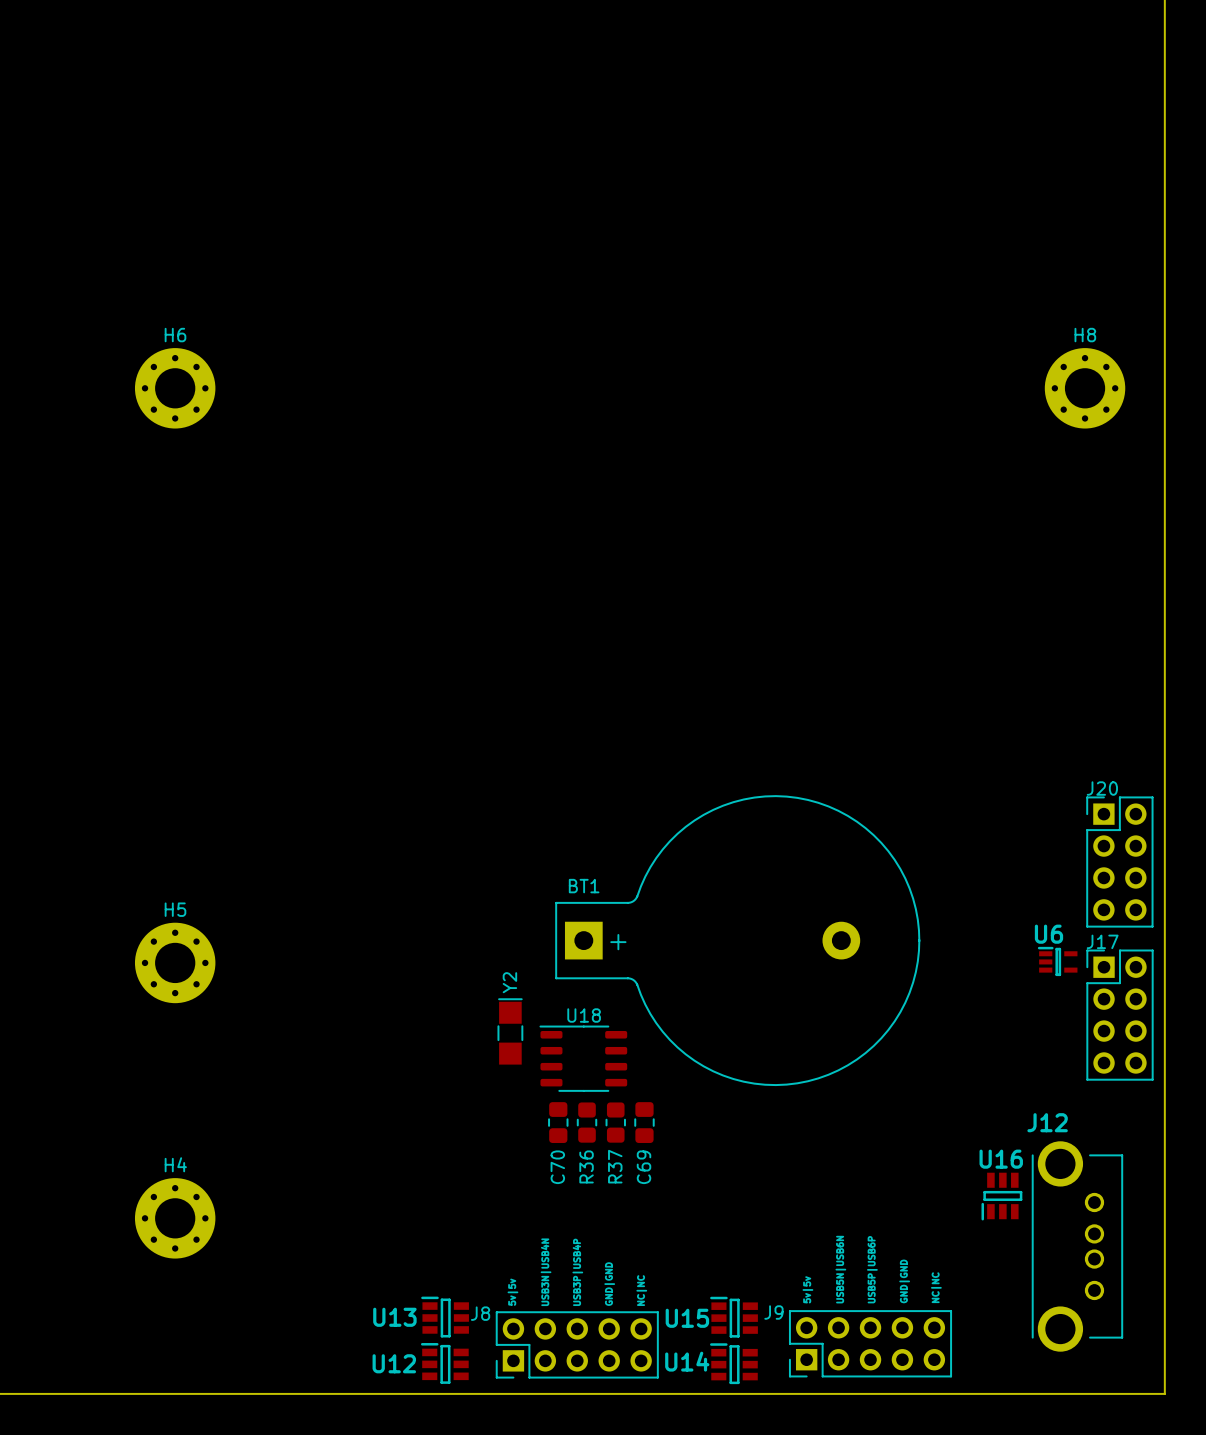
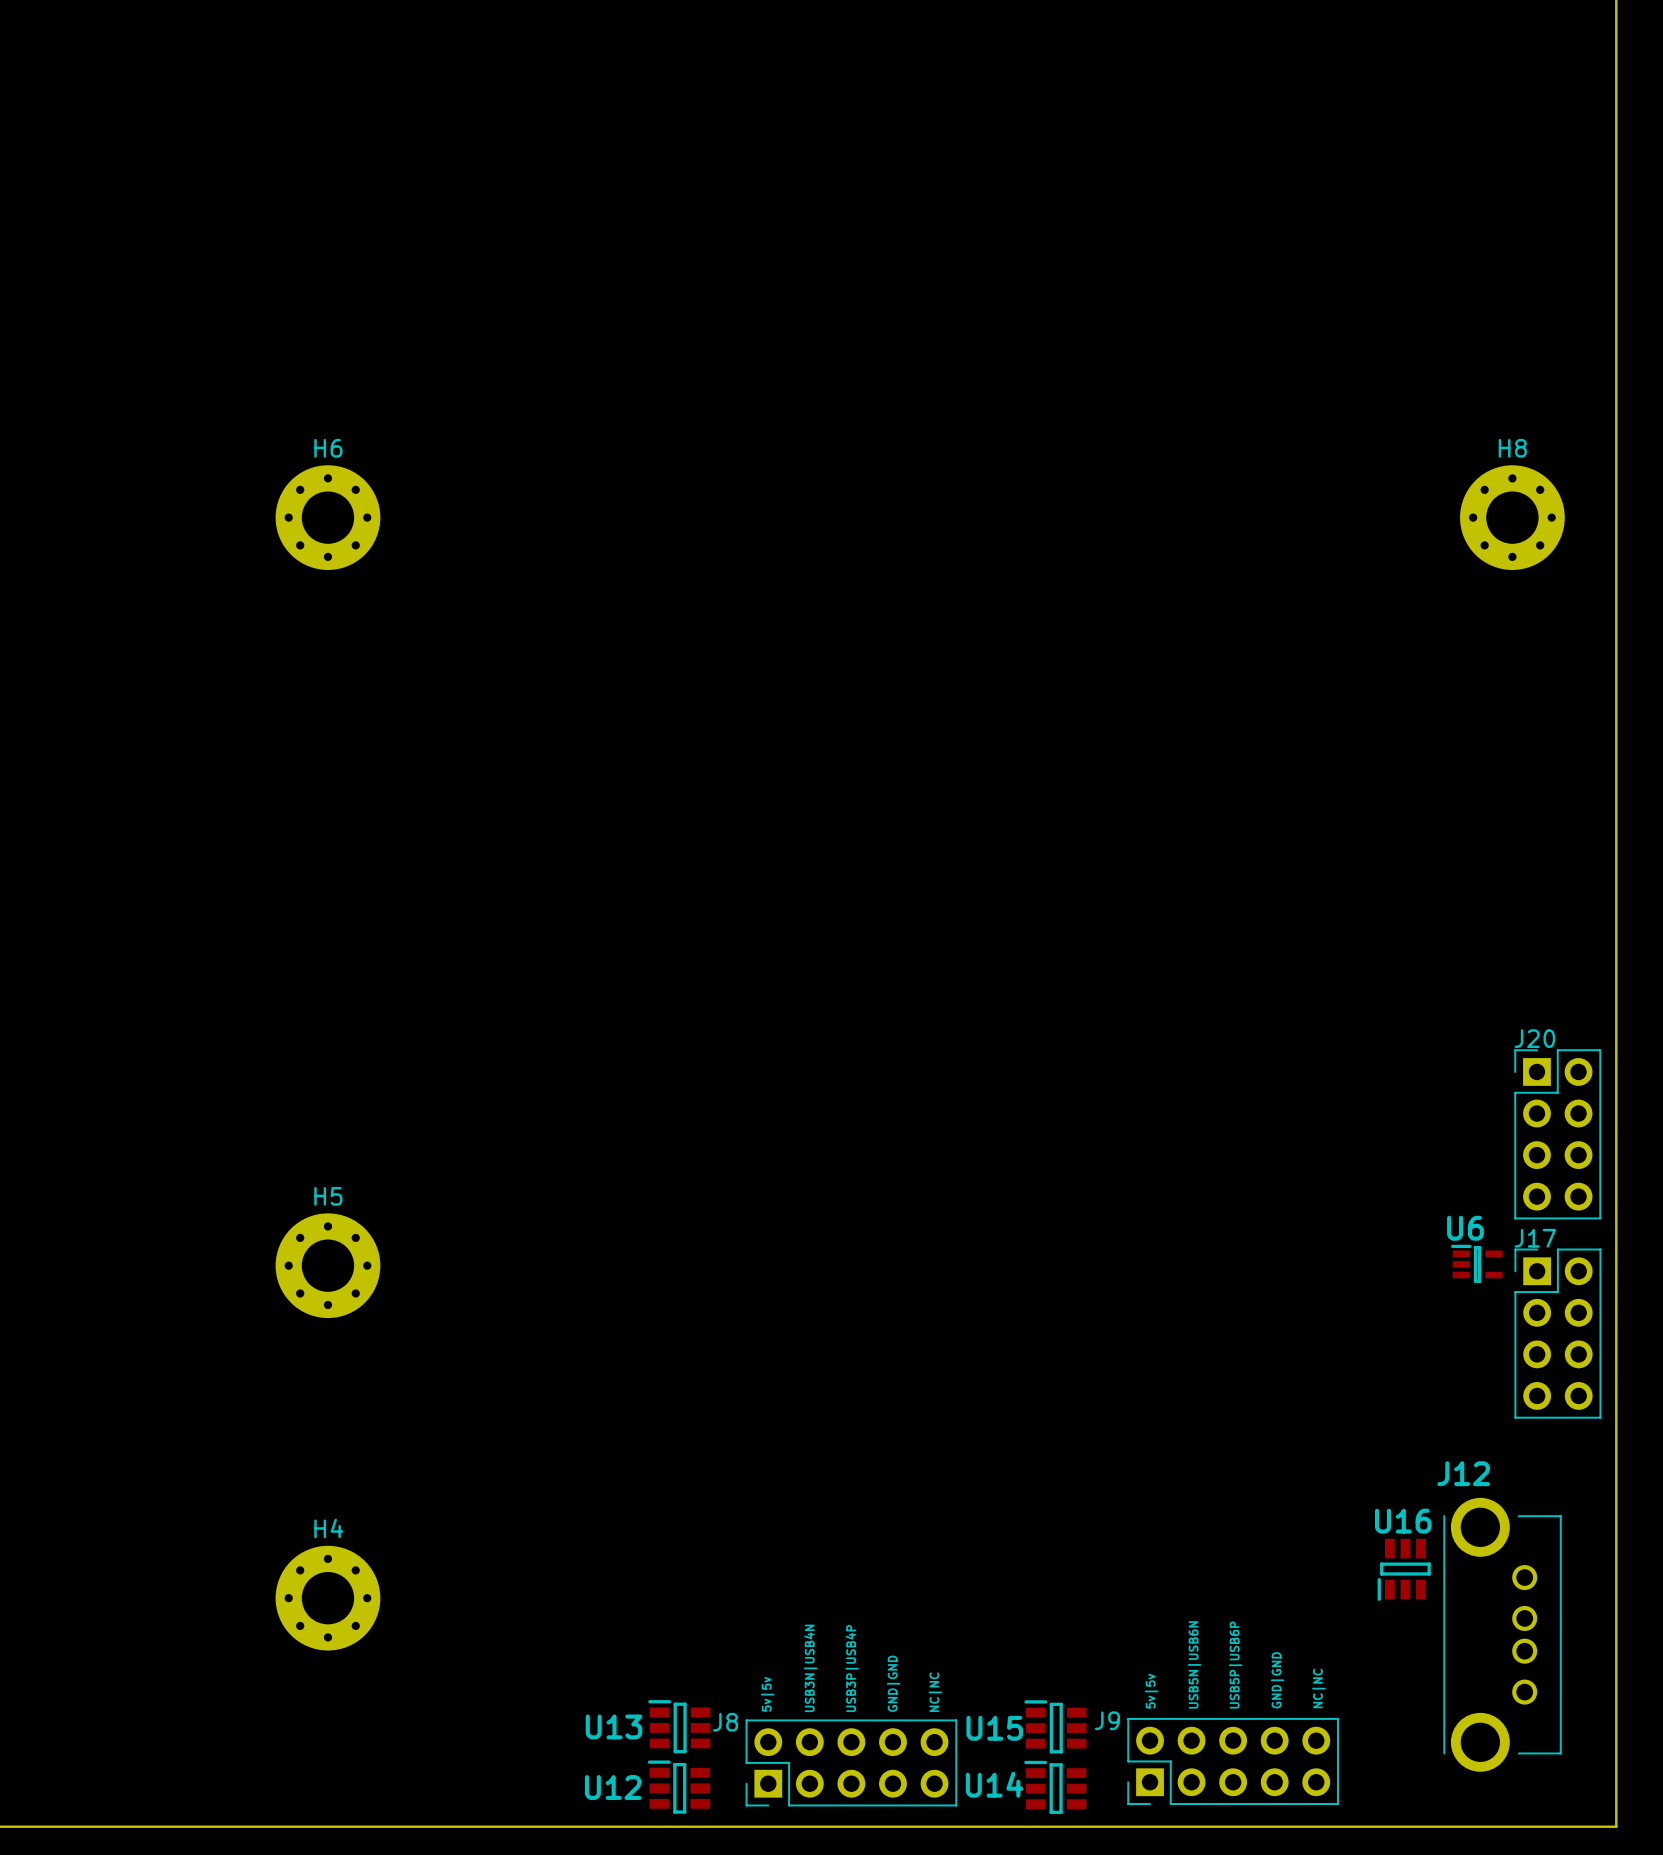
BT1: (737, 940) -> none
Y2: (510, 1031) -> none
U18: (583, 1058) -> none
C70: (558, 1122) -> none
R36: (587, 1122) -> none
R37: (615, 1122) -> none
C69: (644, 1122) -> none

